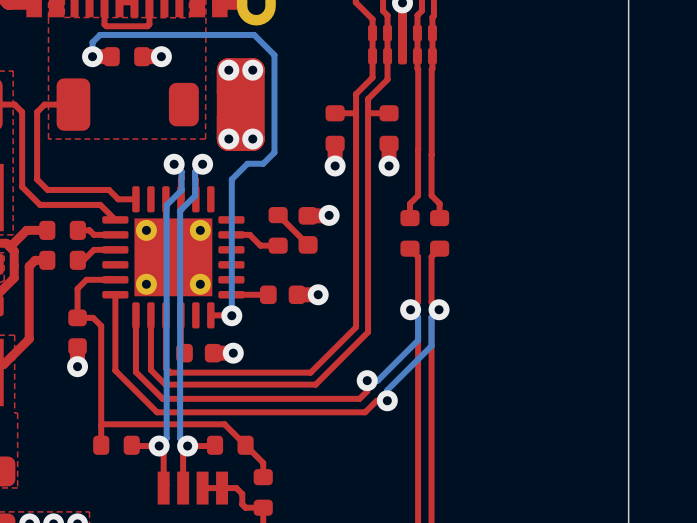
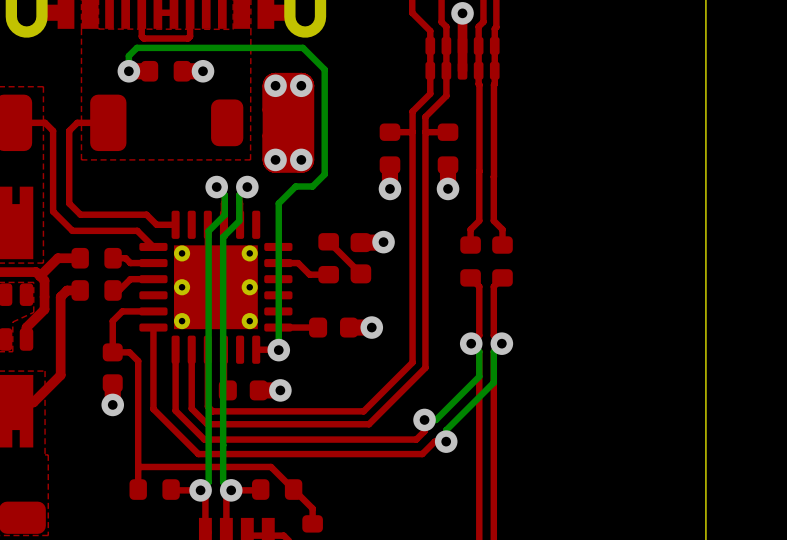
part footprint: [102, 186, 245, 329] -> [139, 210, 293, 364]

